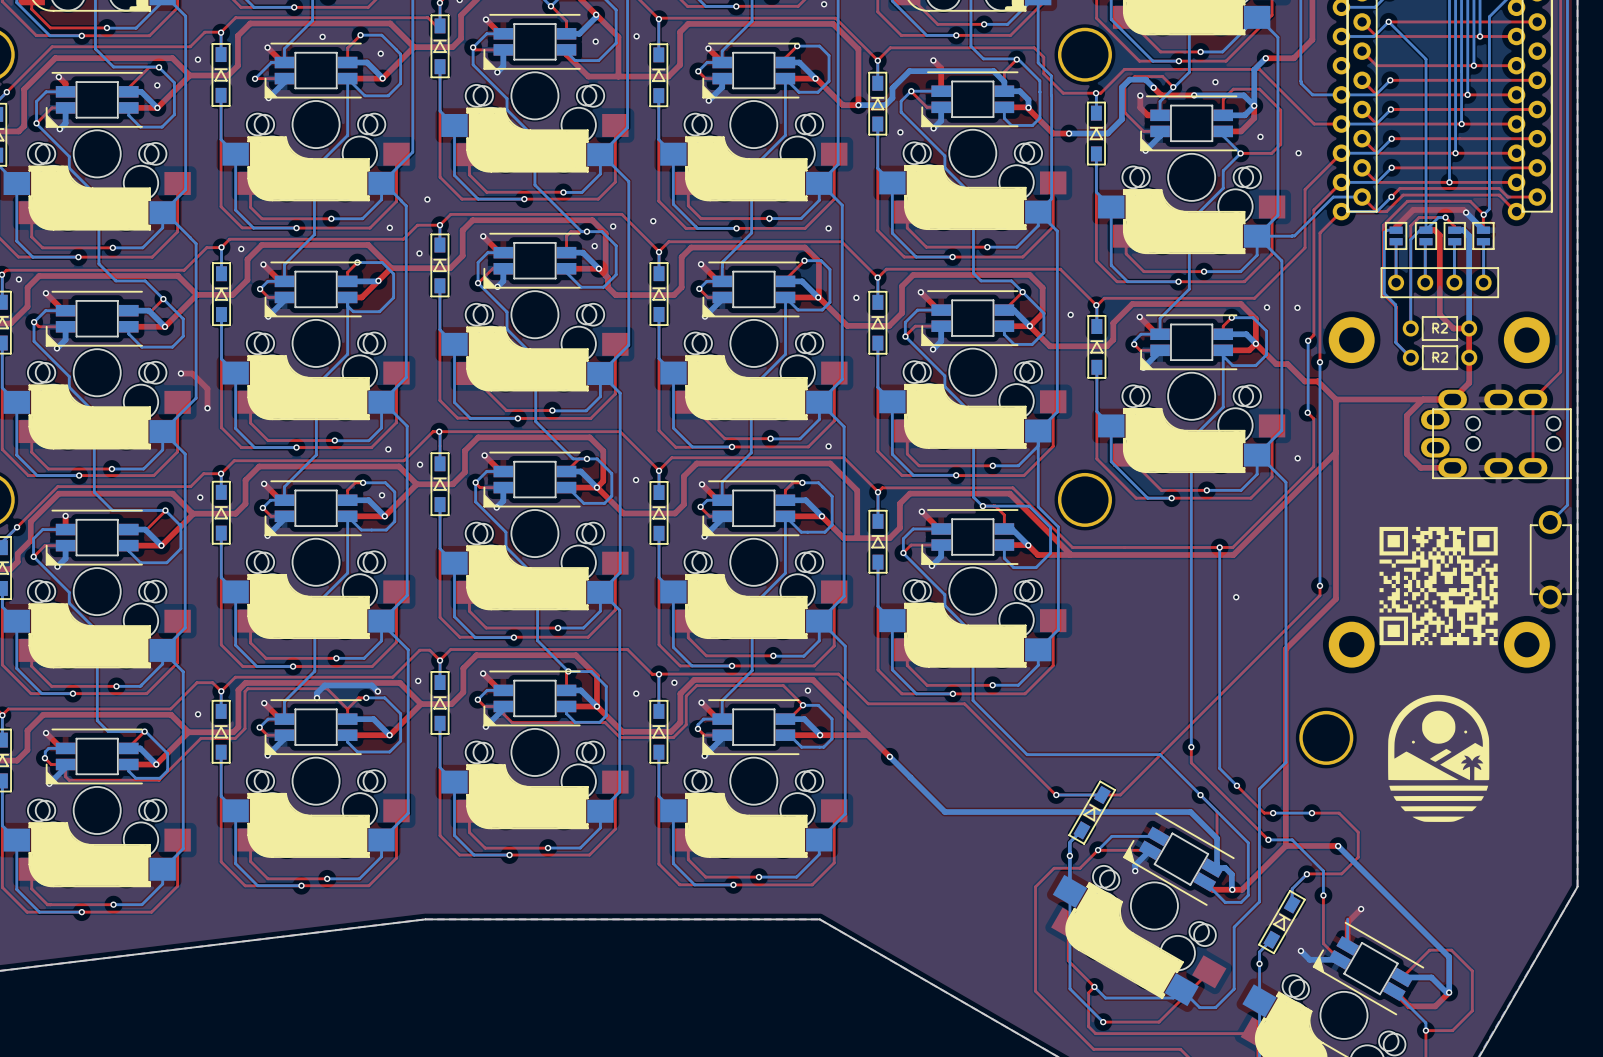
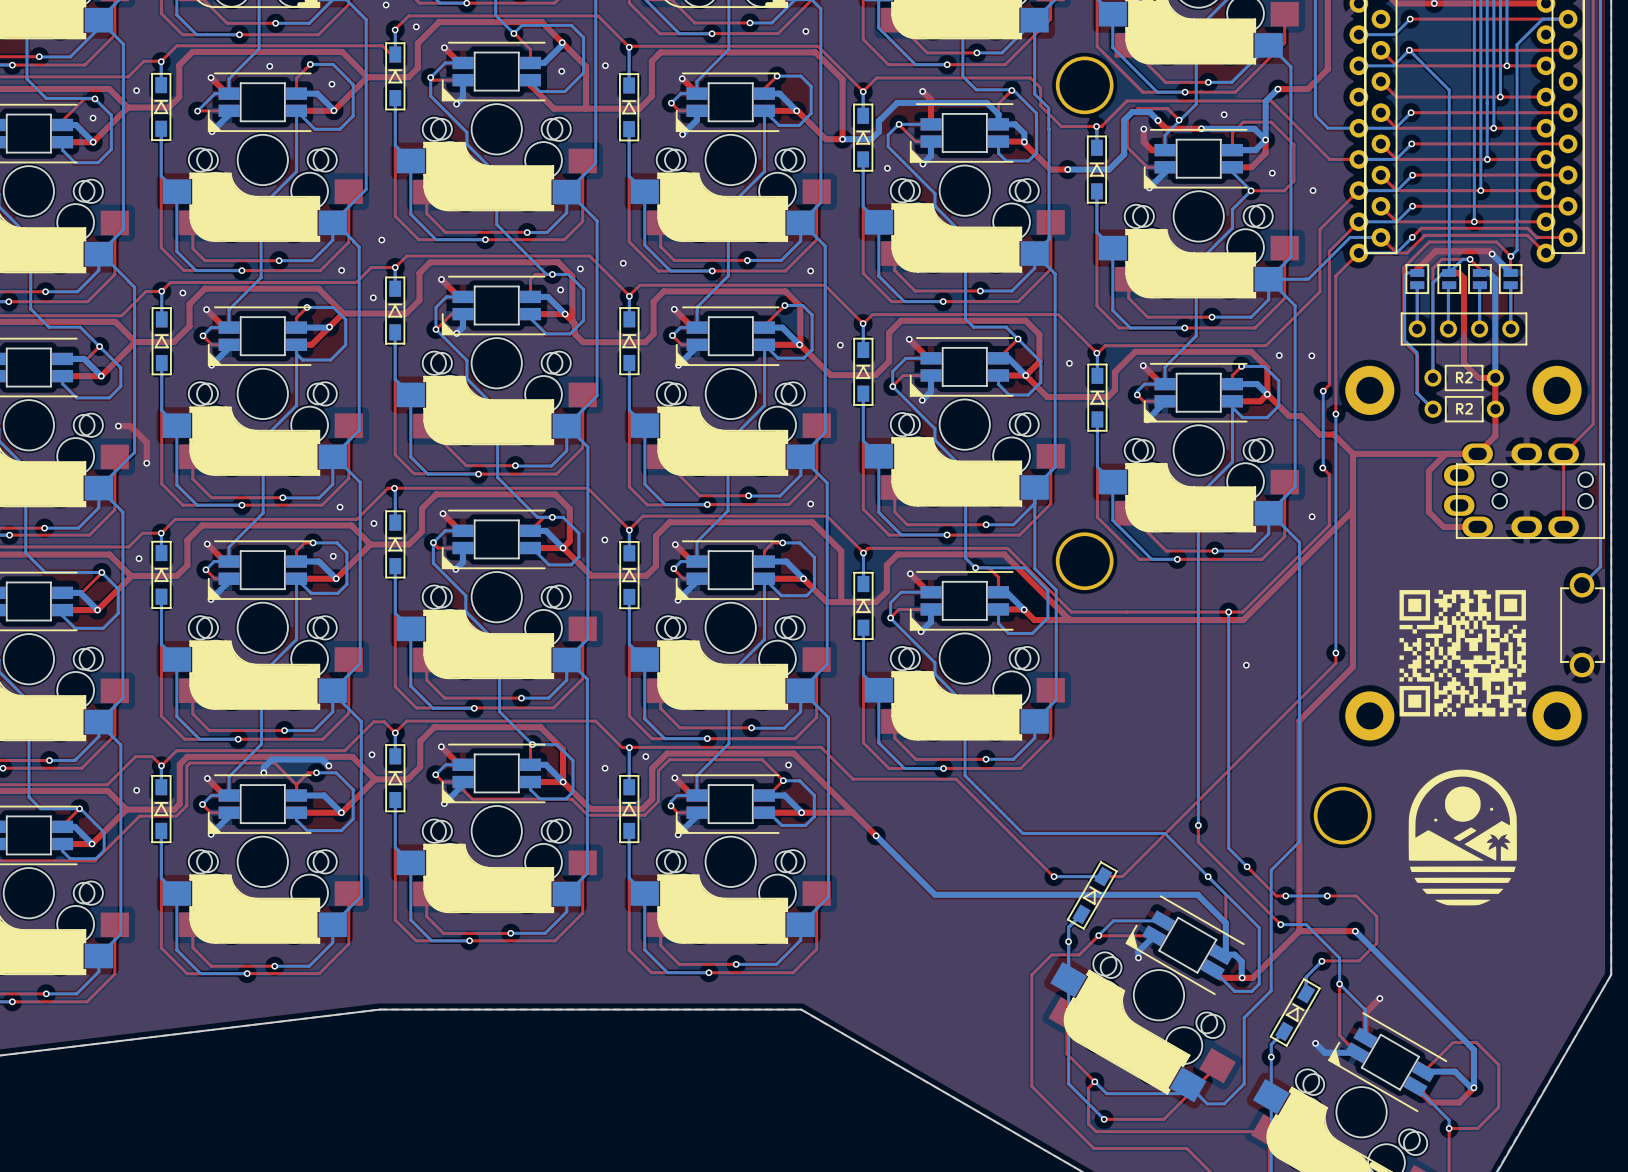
bottom track: none -> (1339, 984) (1365, 1009)

